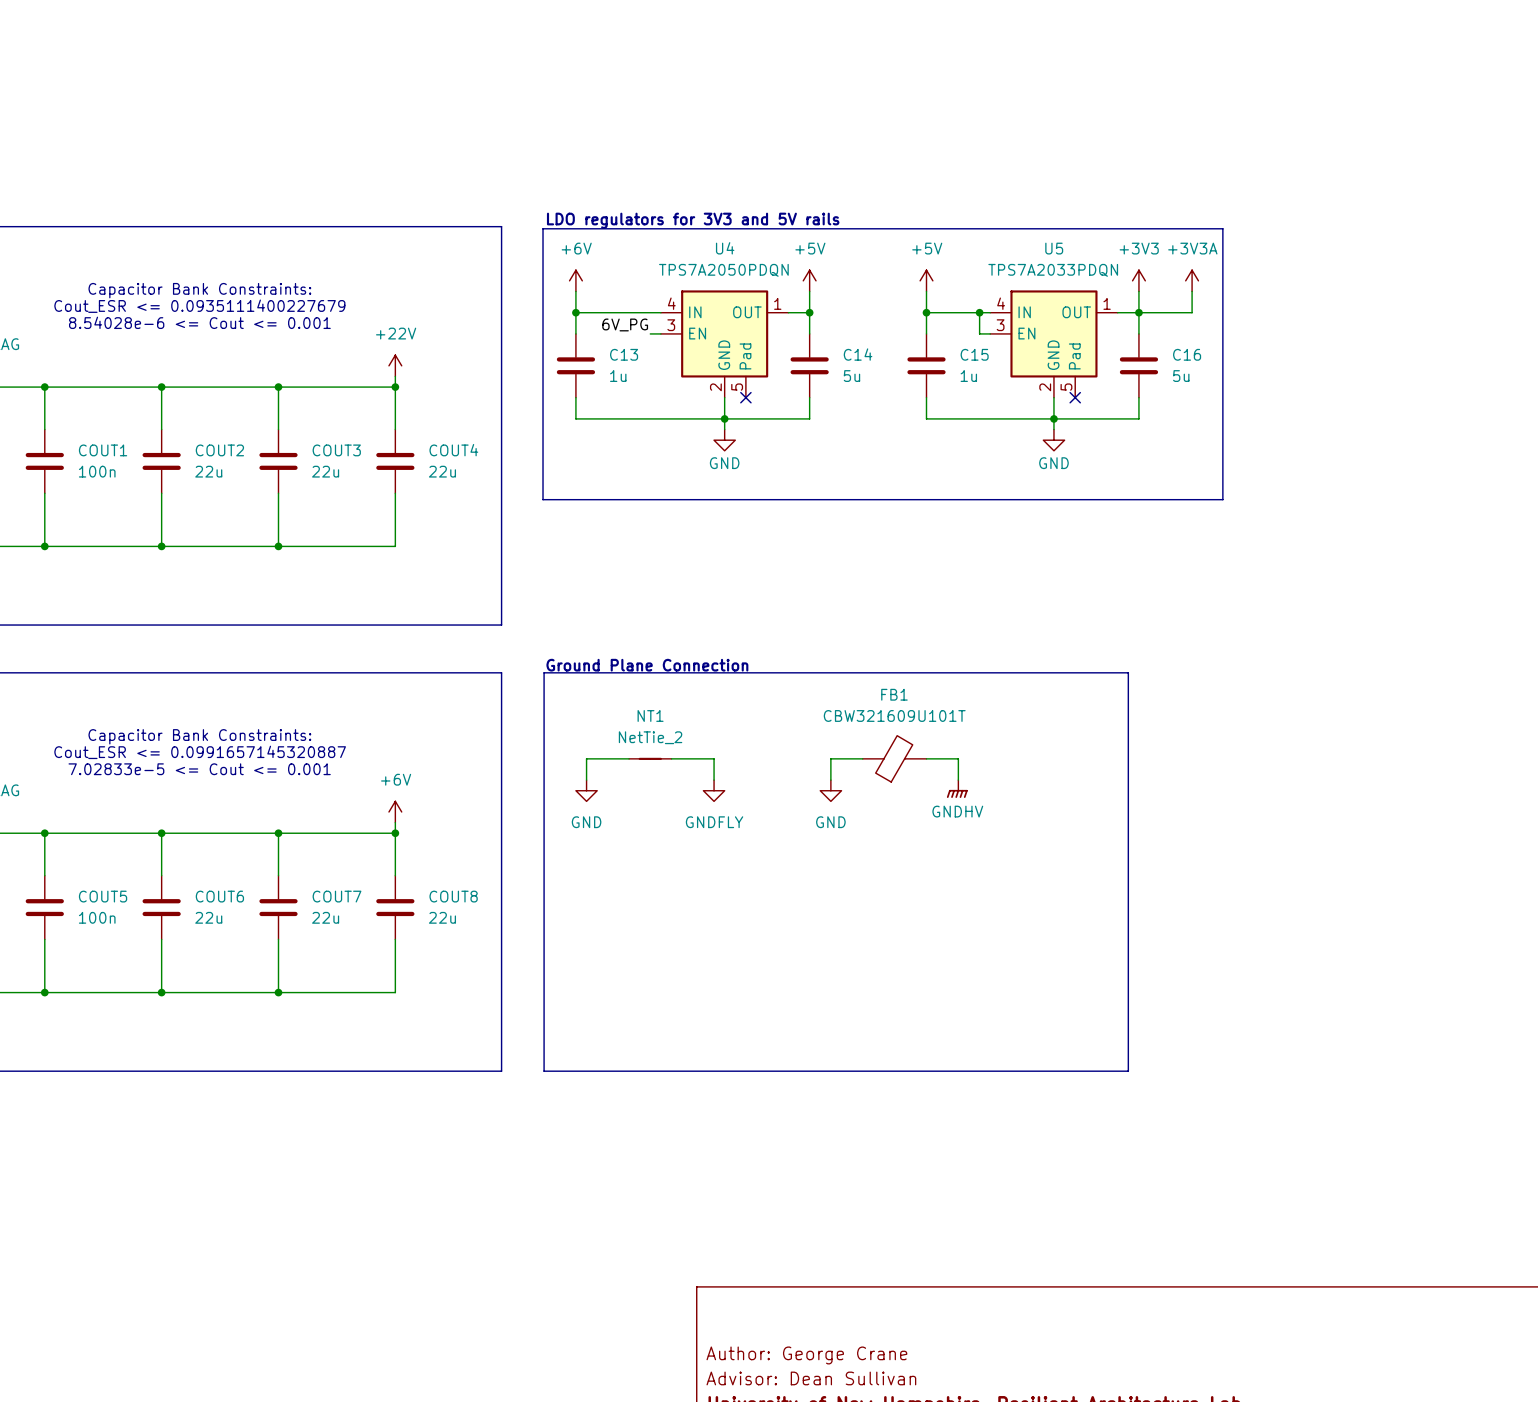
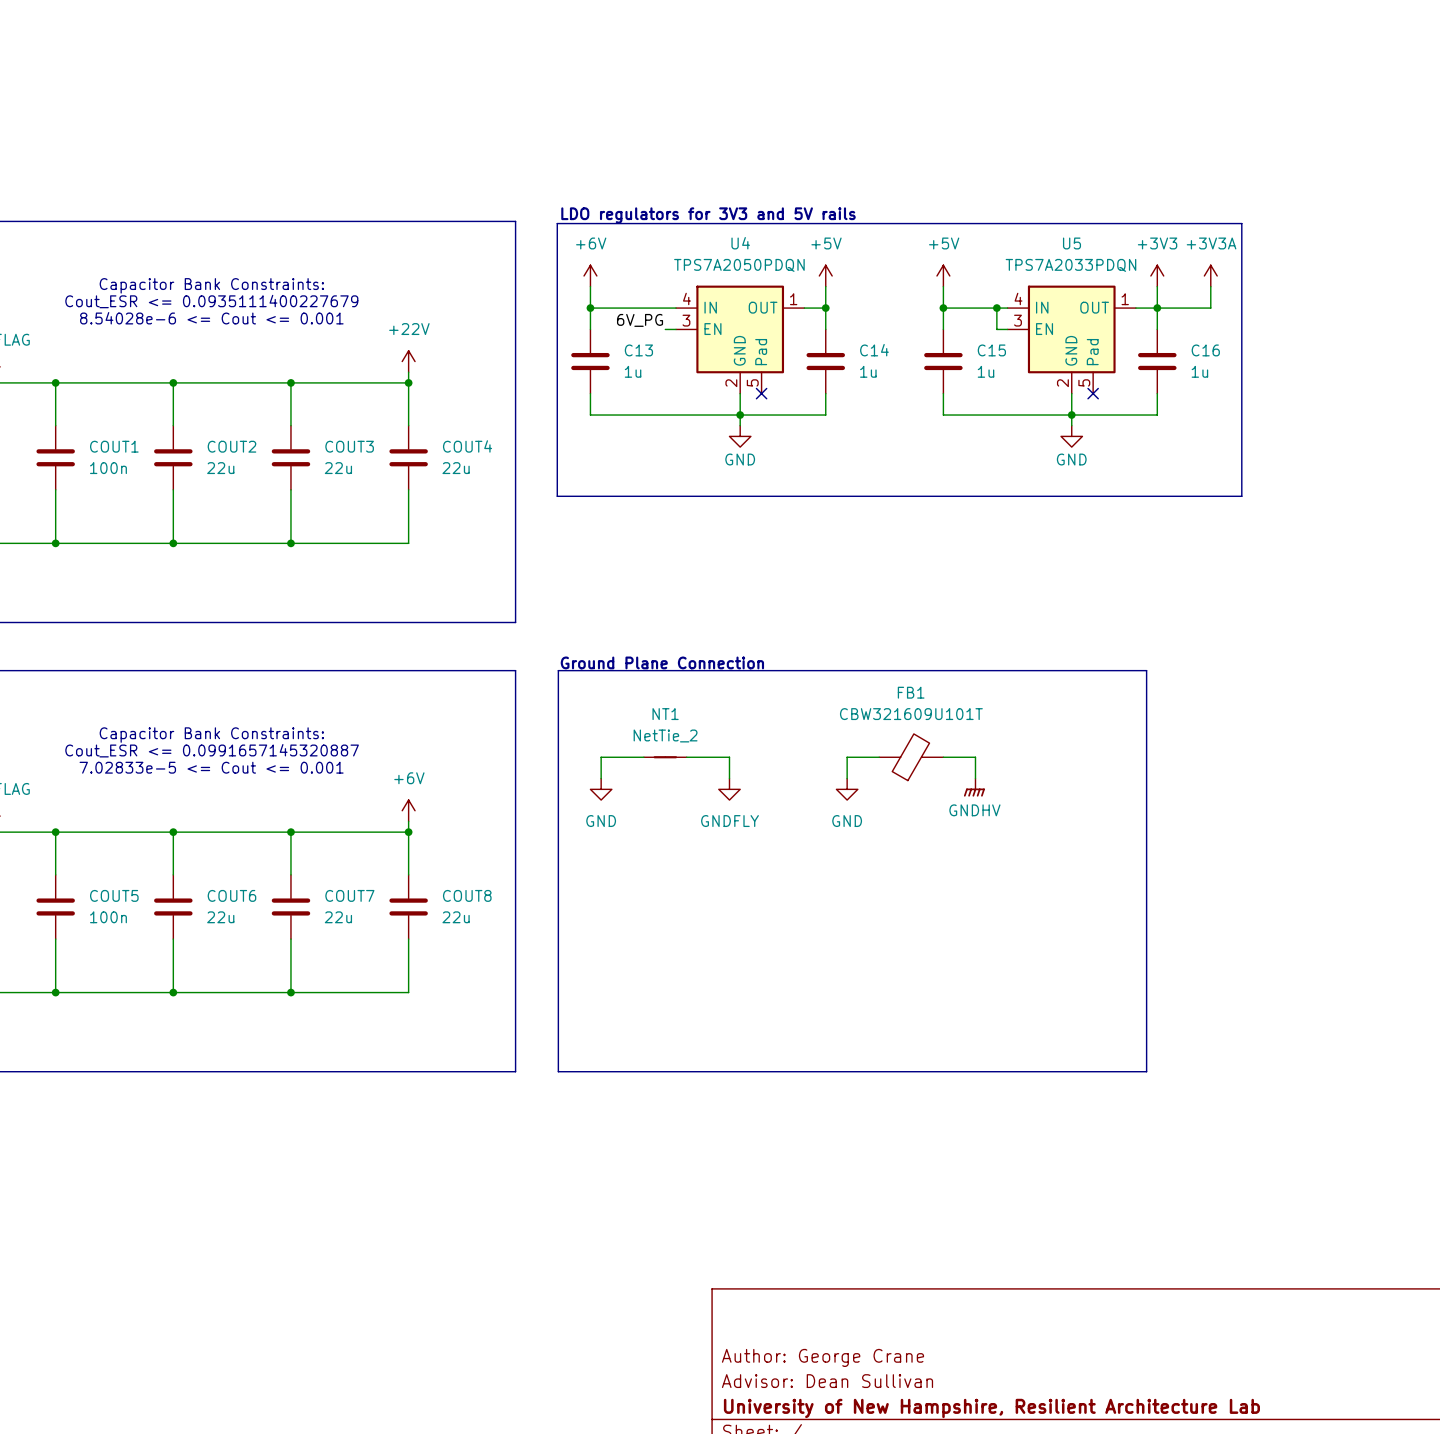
C14 value: 5u (851, 376) -> 1u (868, 371)
C16 value: 5u (1181, 376) -> 1u (1199, 371)

